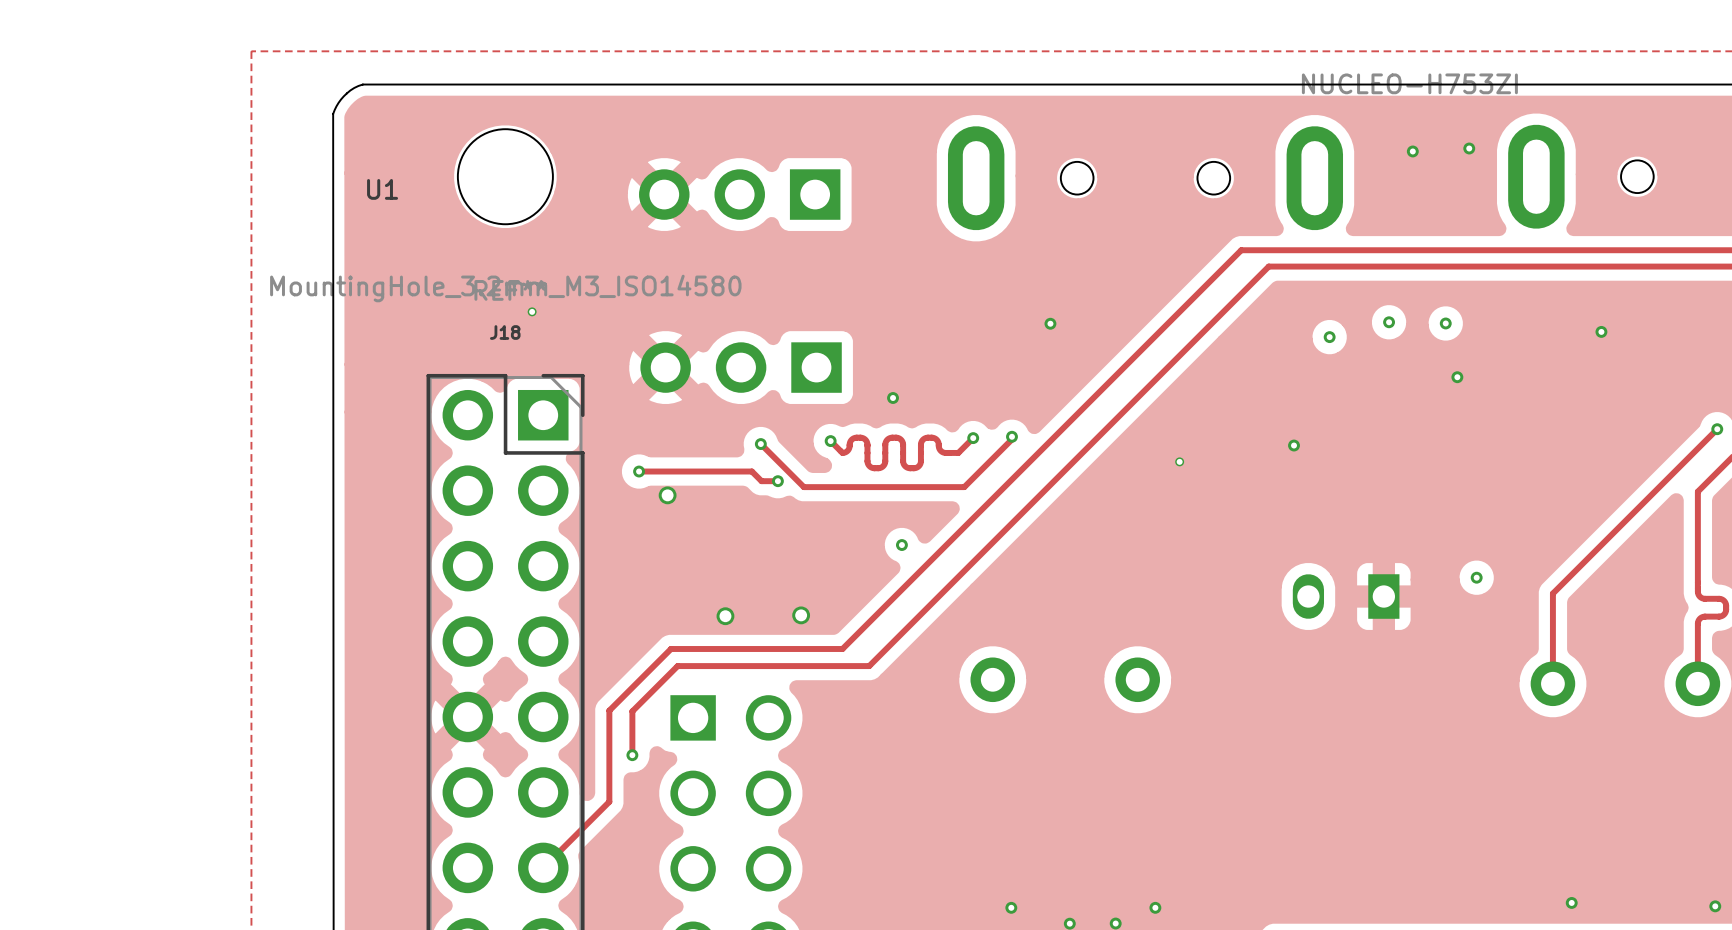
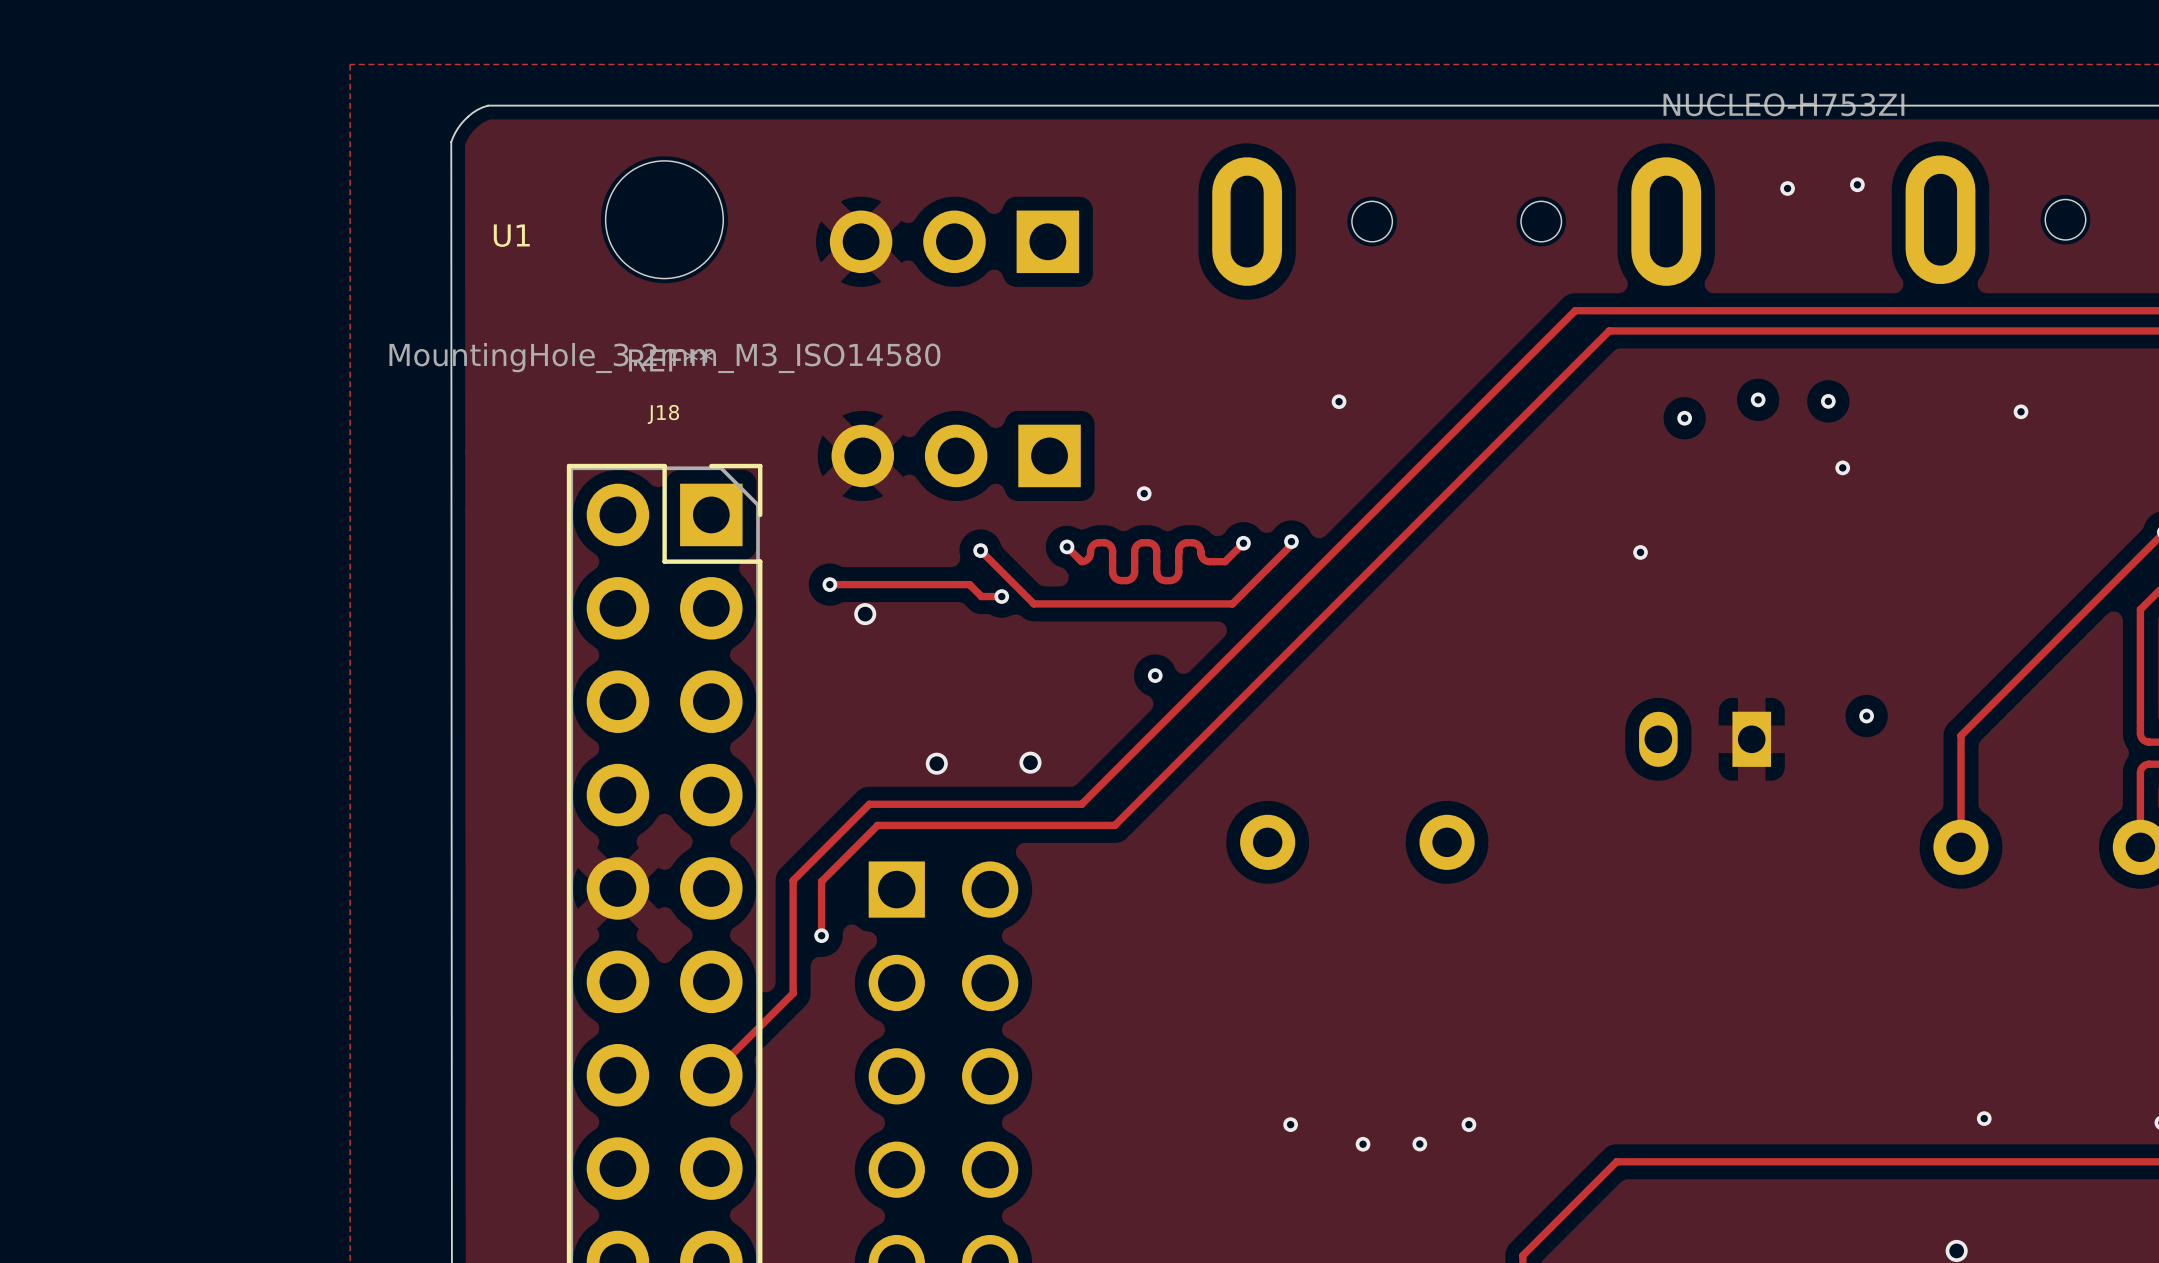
via: (532, 311) -> none
via: (1179, 461) -> none

